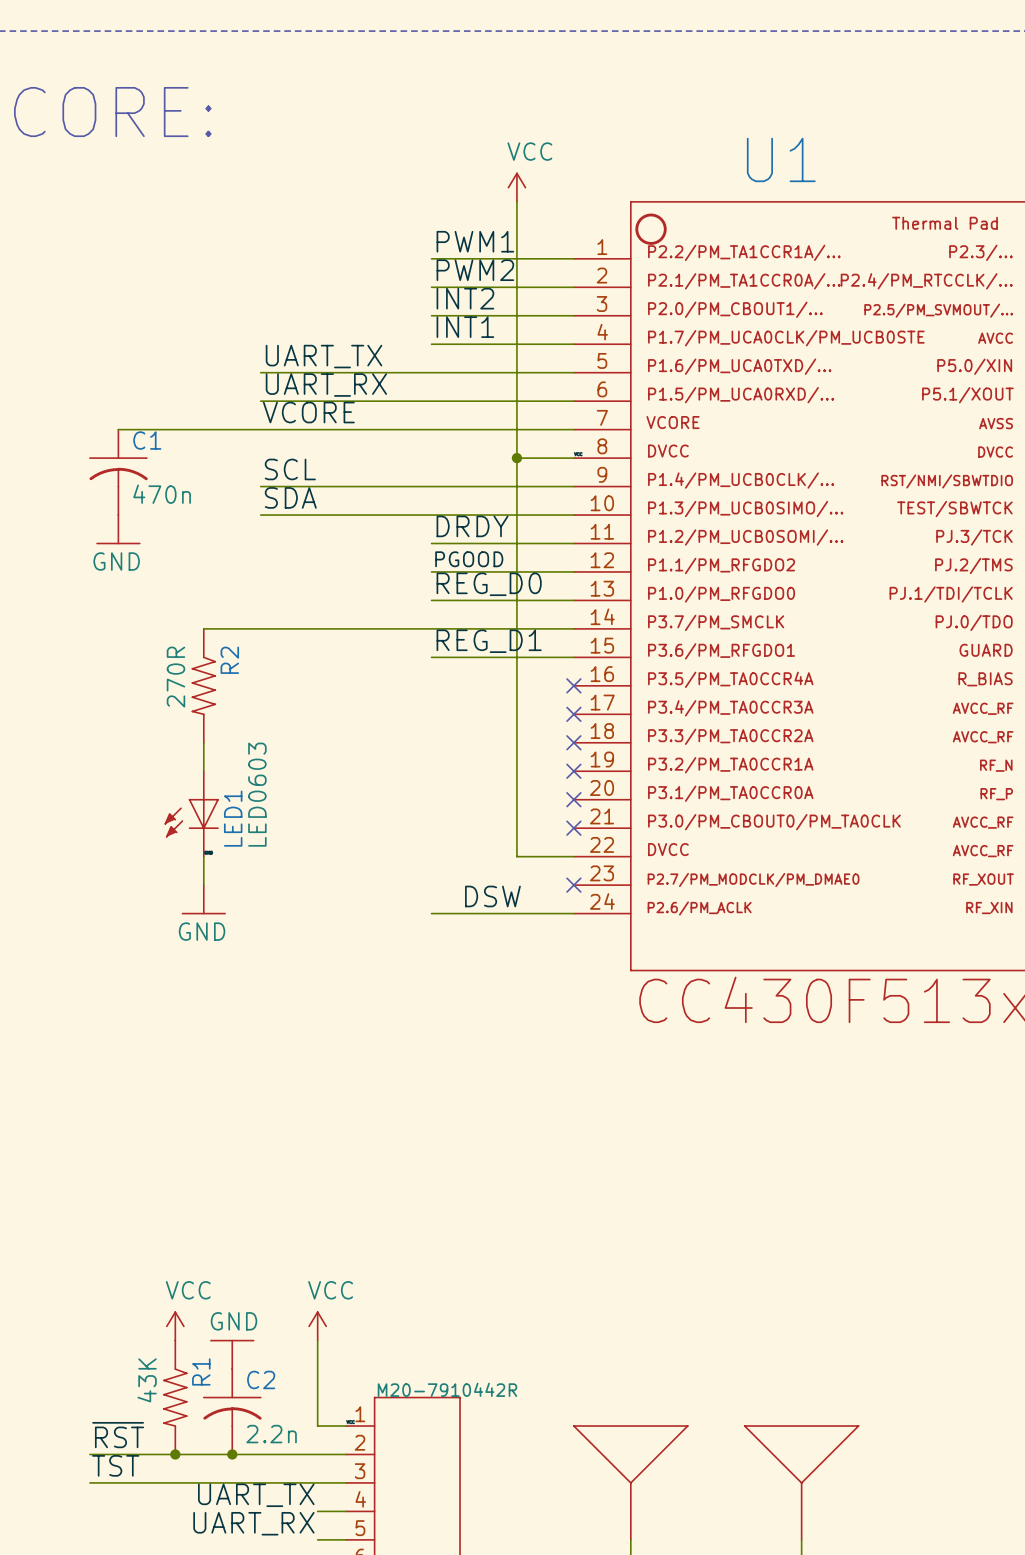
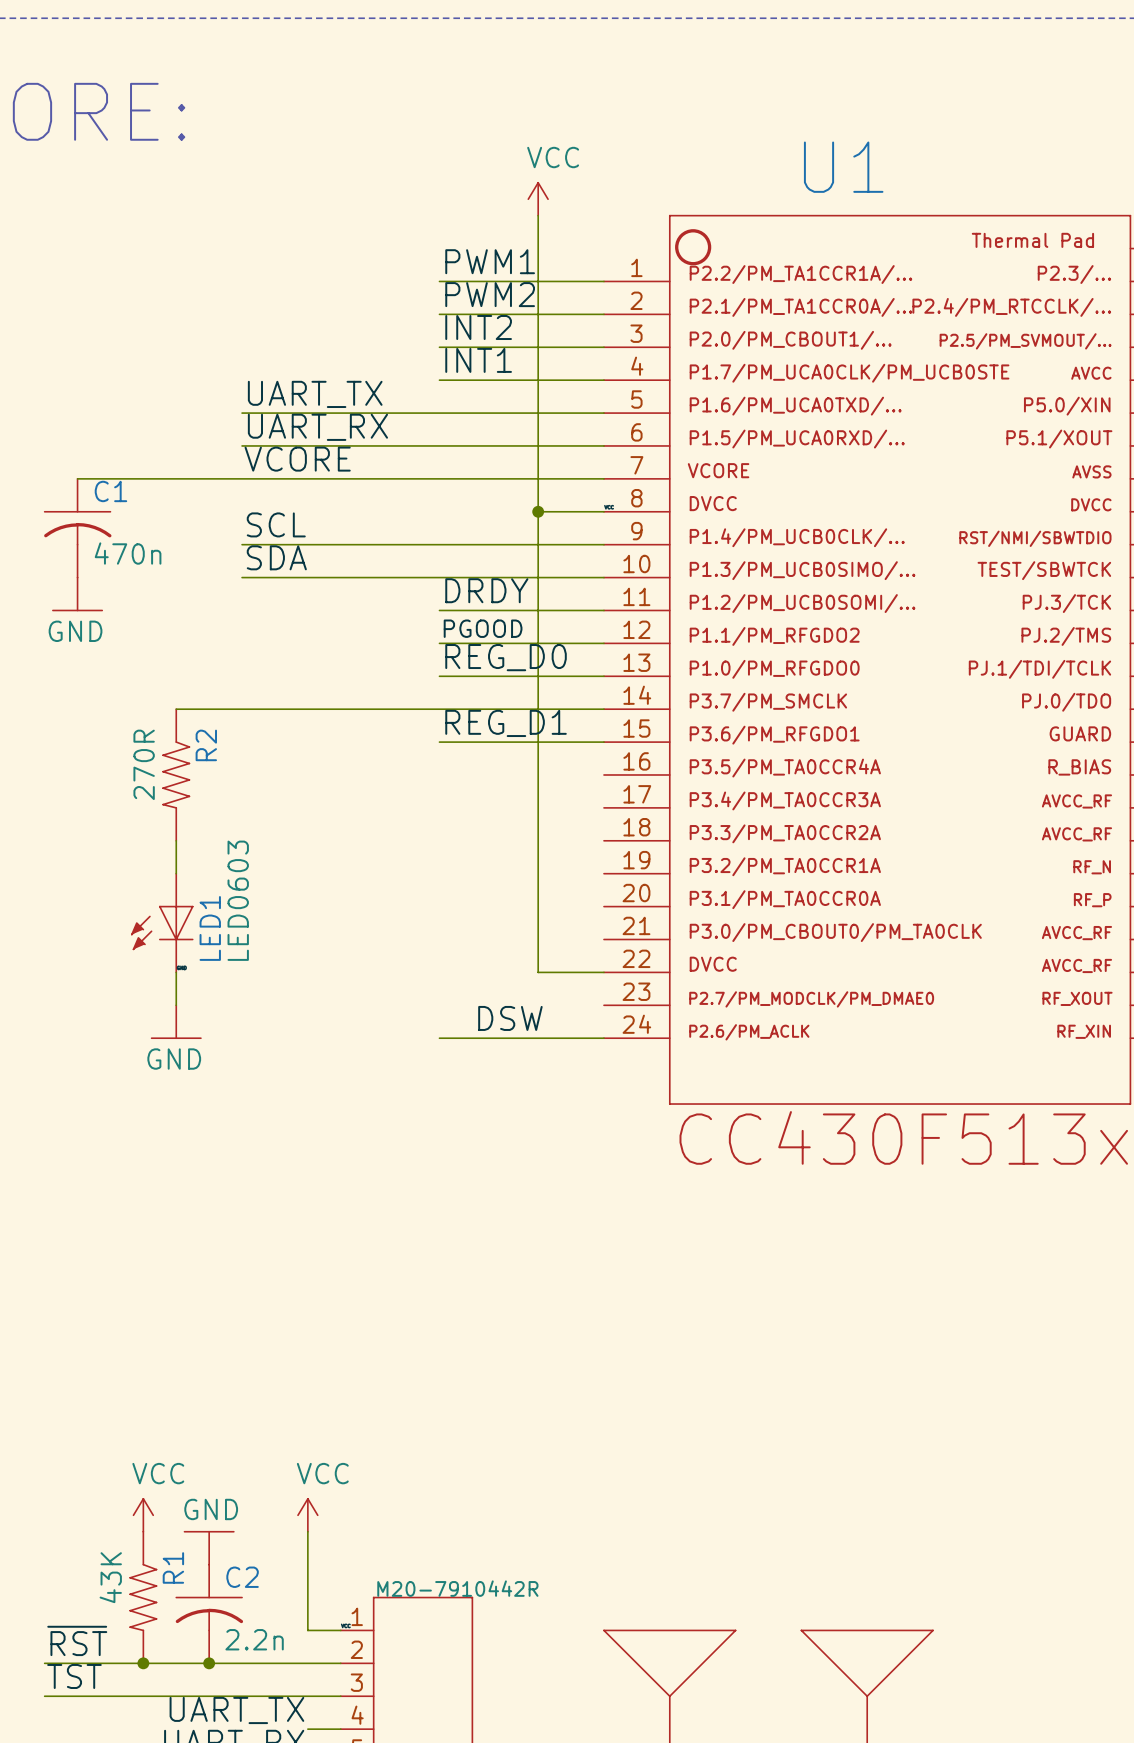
no-connect mark: (573, 685) -> none
no-connect mark: (573, 714) -> none
no-connect mark: (573, 742) -> none
no-connect mark: (573, 771) -> none
no-connect mark: (573, 799) -> none
no-connect mark: (573, 828) -> none
no-connect mark: (573, 885) -> none

